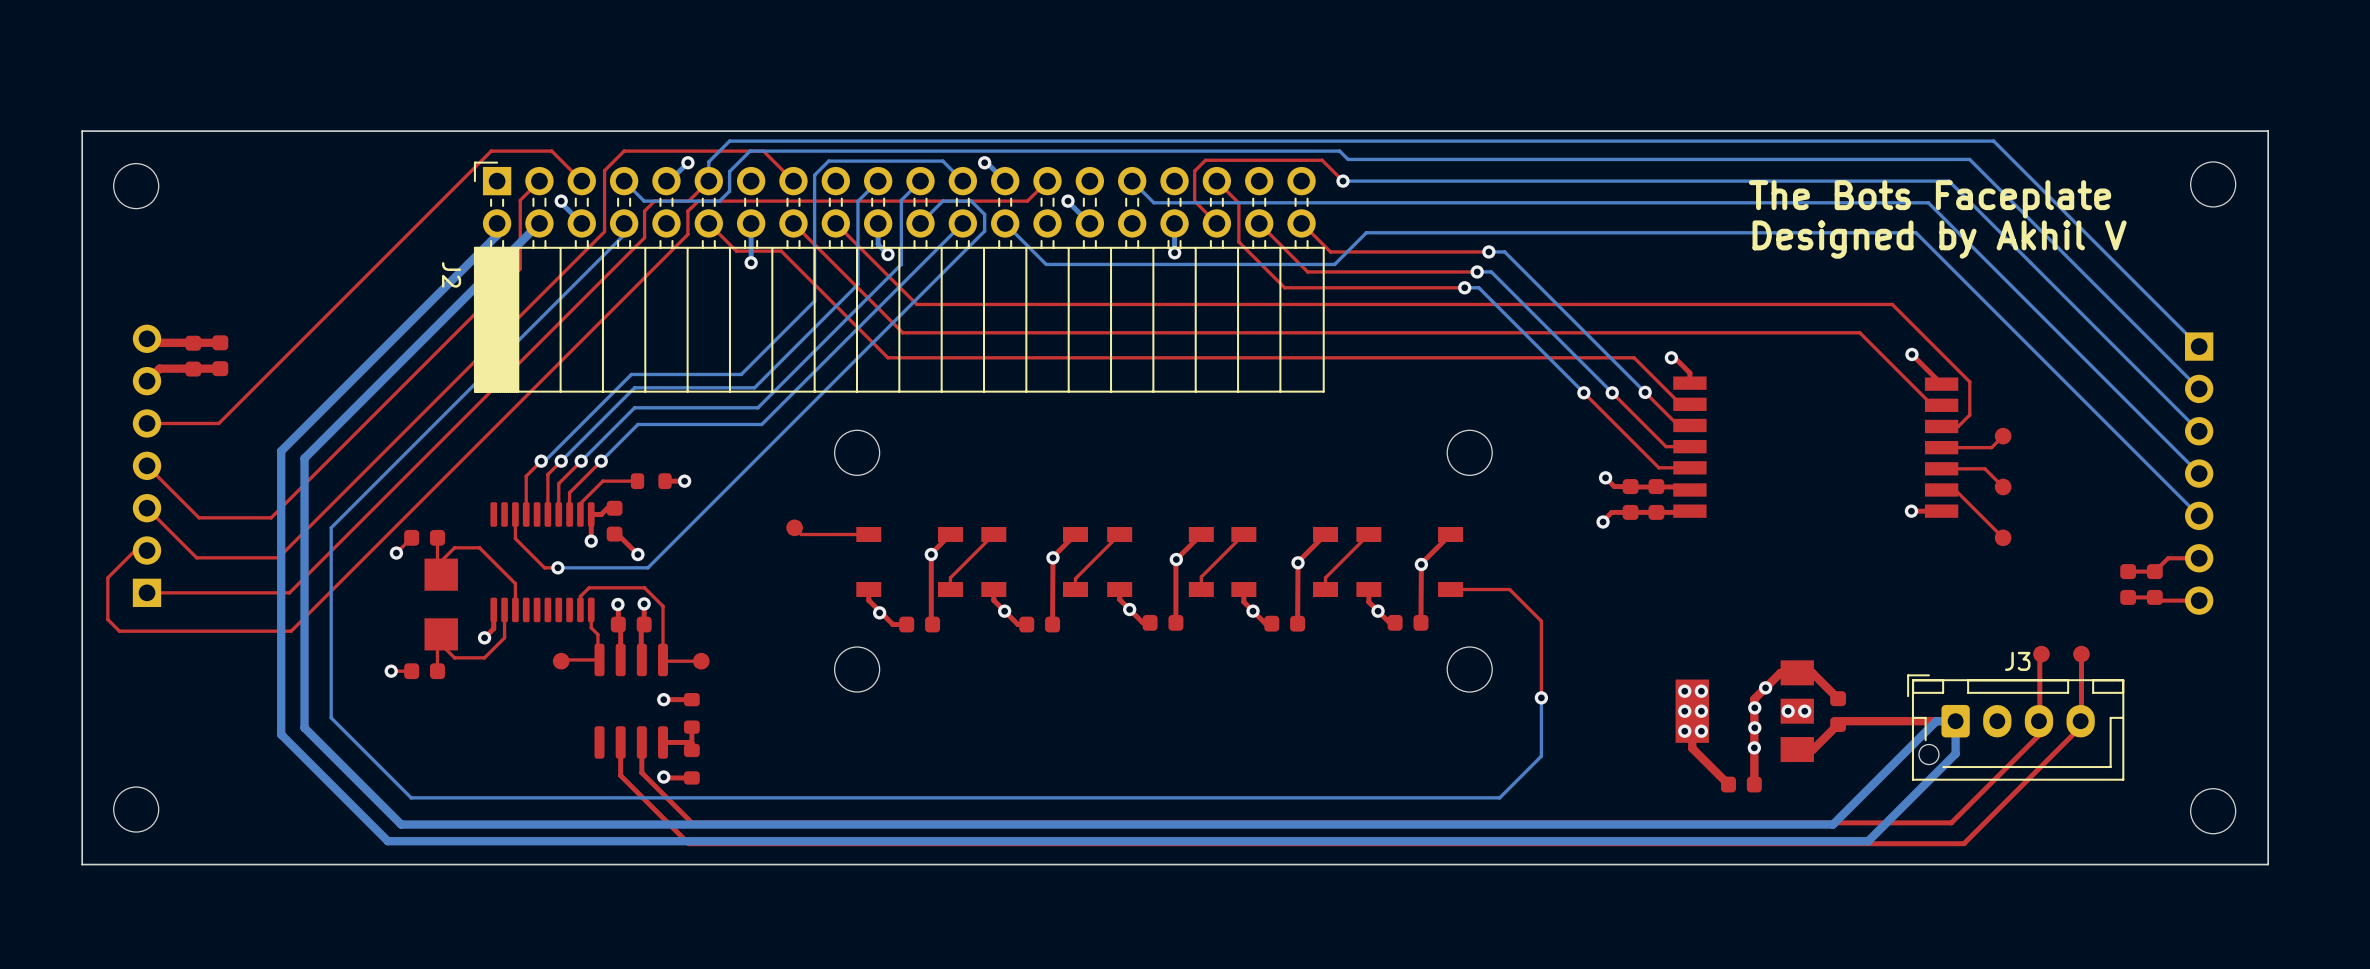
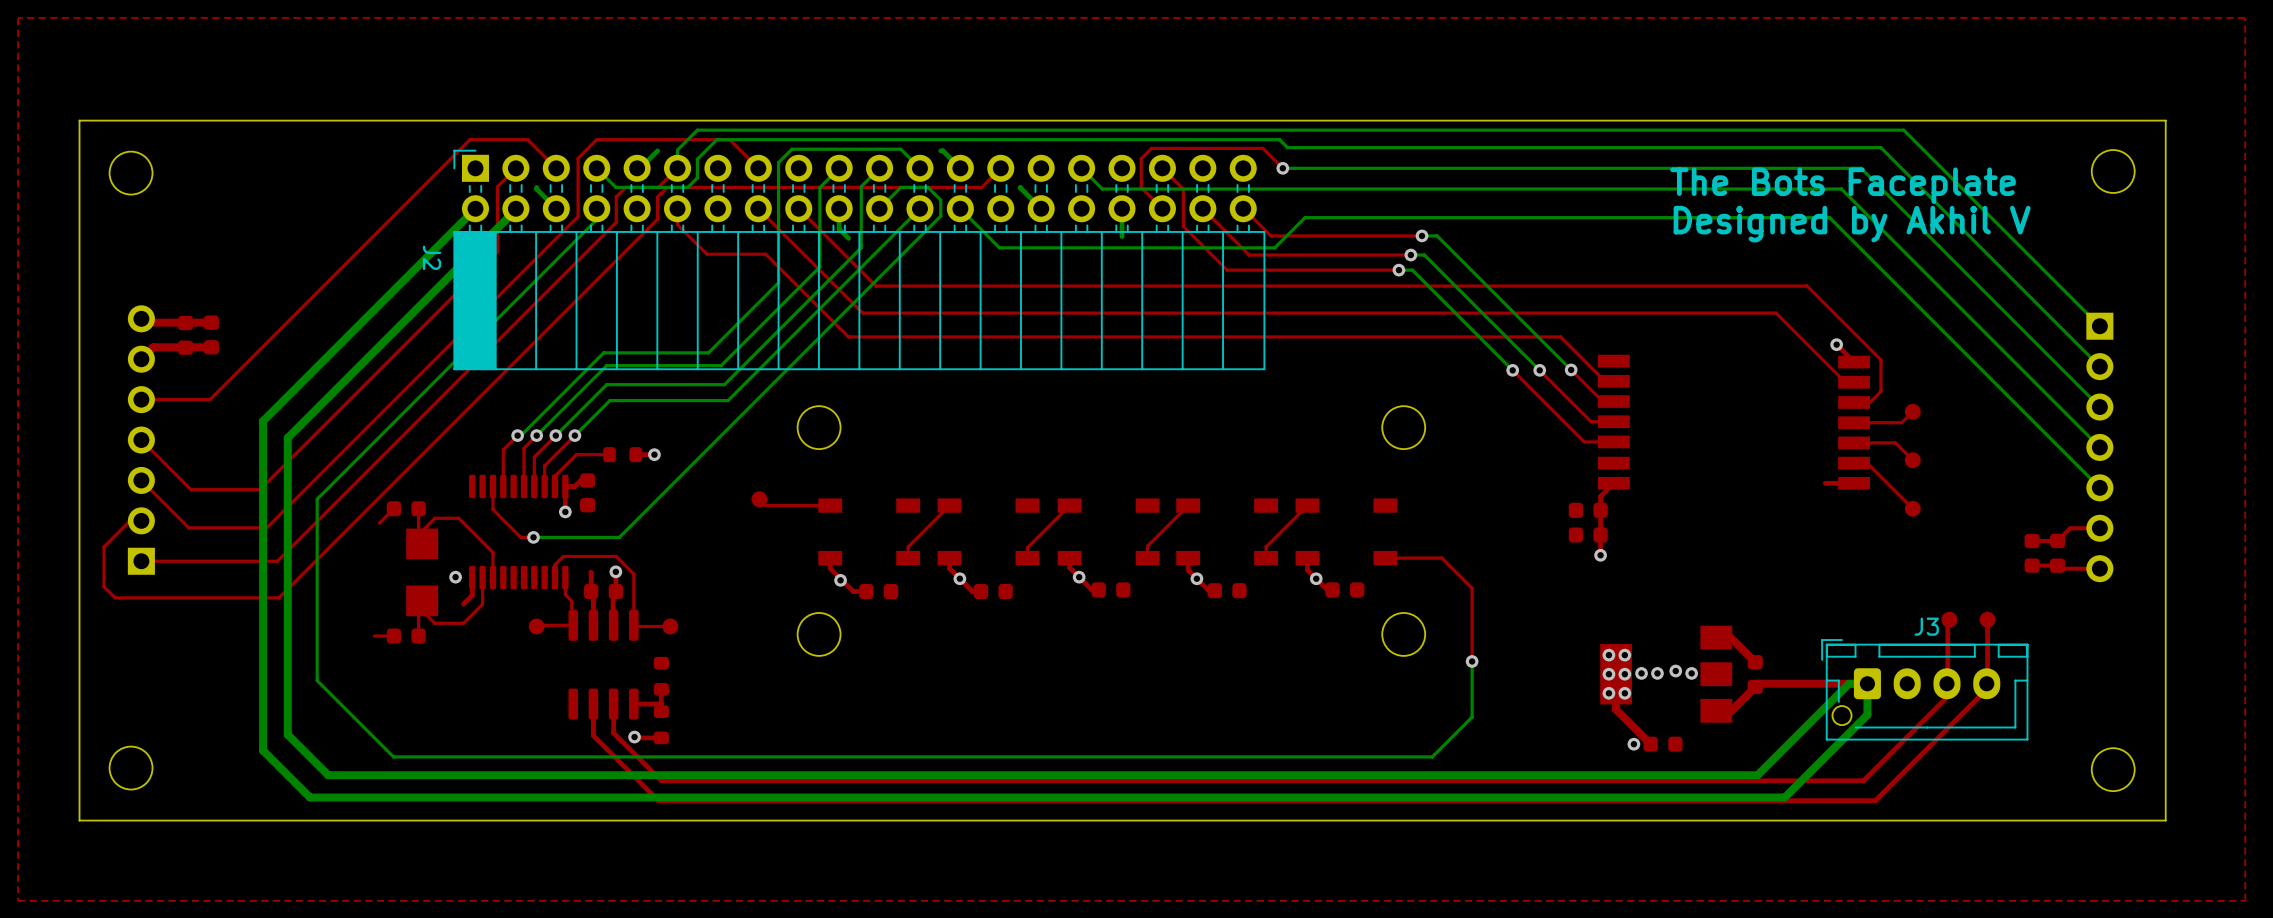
top zone outline: none -> (2245, 17) (18, 17) (18, 900) (2245, 900) (2245, 17)
via: (687, 162) -> none
via: (984, 162) -> none
via: (561, 201) -> none
via: (1067, 201) -> none
bottom track: (497, 223) (497, 235) (281, 451) (281, 734) (387, 841) (1869, 840) -> (475, 208) (263, 421) (263, 750) (310, 797) (1784, 797)
bottom track: (539, 223) (304, 458) (304, 727) (401, 824) (1833, 824) (1840, 817) -> (515, 208) (287, 437) (287, 734) (328, 775) (1757, 775)
top track: (708, 223) (736, 251) (781, 251) (801, 271) -> (677, 208) (677, 224) (706, 254) (765, 254)
bottom track: (751, 223) (751, 262) -> none
via: (1174, 252) -> none
via: (887, 254) -> none
via: (751, 262) -> none
top track: (1911, 354) (1923, 365) -> none
via position: (1911, 354) -> (1836, 344)
top track: (1671, 357) (1674, 357) (1689, 372) (1689, 383) -> none
via: (1671, 357) -> none
top track: (1605, 477) (1614, 486) (1686, 486) -> none
via: (1605, 477) -> none
part: (1630, 499) -> none
part: (1656, 499) -> none
via: (1911, 511) -> none
top track: (1688, 512) (1611, 512) (1603, 522) -> (1612, 484) (1600, 496) (1600, 555)
via: (1603, 522) -> none
top track: (617, 534) (637, 554) -> none
top track: (950, 534) (930, 554) (931, 623) -> none
top track: (1075, 534) (1052, 557) (1052, 624) -> none
top track: (1201, 534) (1175, 559) (1175, 622) -> none
top track: (1325, 534) (1297, 562) (1297, 623) -> none
top track: (1450, 534) (1420, 564) (1420, 622) -> none
part: none -> (1588, 510)
via: (396, 553) -> none
via: (637, 554) -> none
via: (931, 554) -> none
via: (1052, 557) -> none
via: (1176, 559) -> none
via: (1298, 562) -> none
via: (1421, 564) -> none
part: none -> (1588, 535)
via: none -> (1600, 555)
via: (617, 604) -> none
via position: (484, 637) -> (455, 577)
via: (391, 671) -> none
top track: (1797, 672) (1780, 672) (1754, 699) (1754, 784) -> none
via: (1765, 687) -> none
via: (663, 699) -> none
top track: (691, 699) (663, 699) -> none
via: none -> (1641, 673)
via: none -> (1657, 673)
via: none -> (1691, 673)
via: (1788, 711) -> none
via: (1804, 711) -> none
via: (1754, 727) -> none
via: (1754, 747) -> none
via: none -> (1633, 744)

